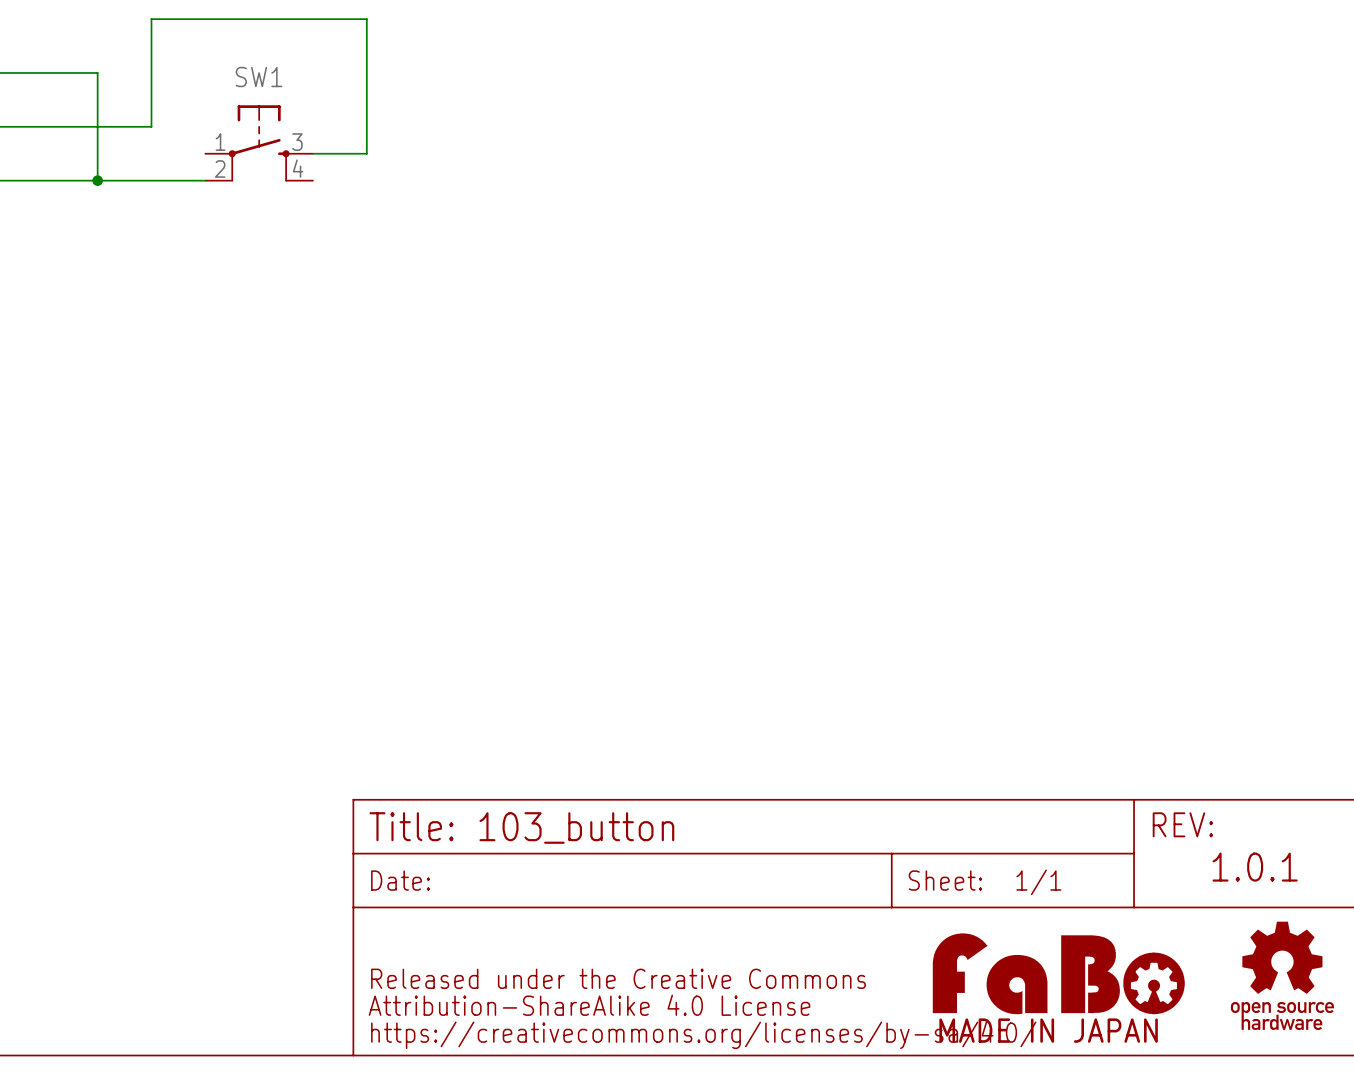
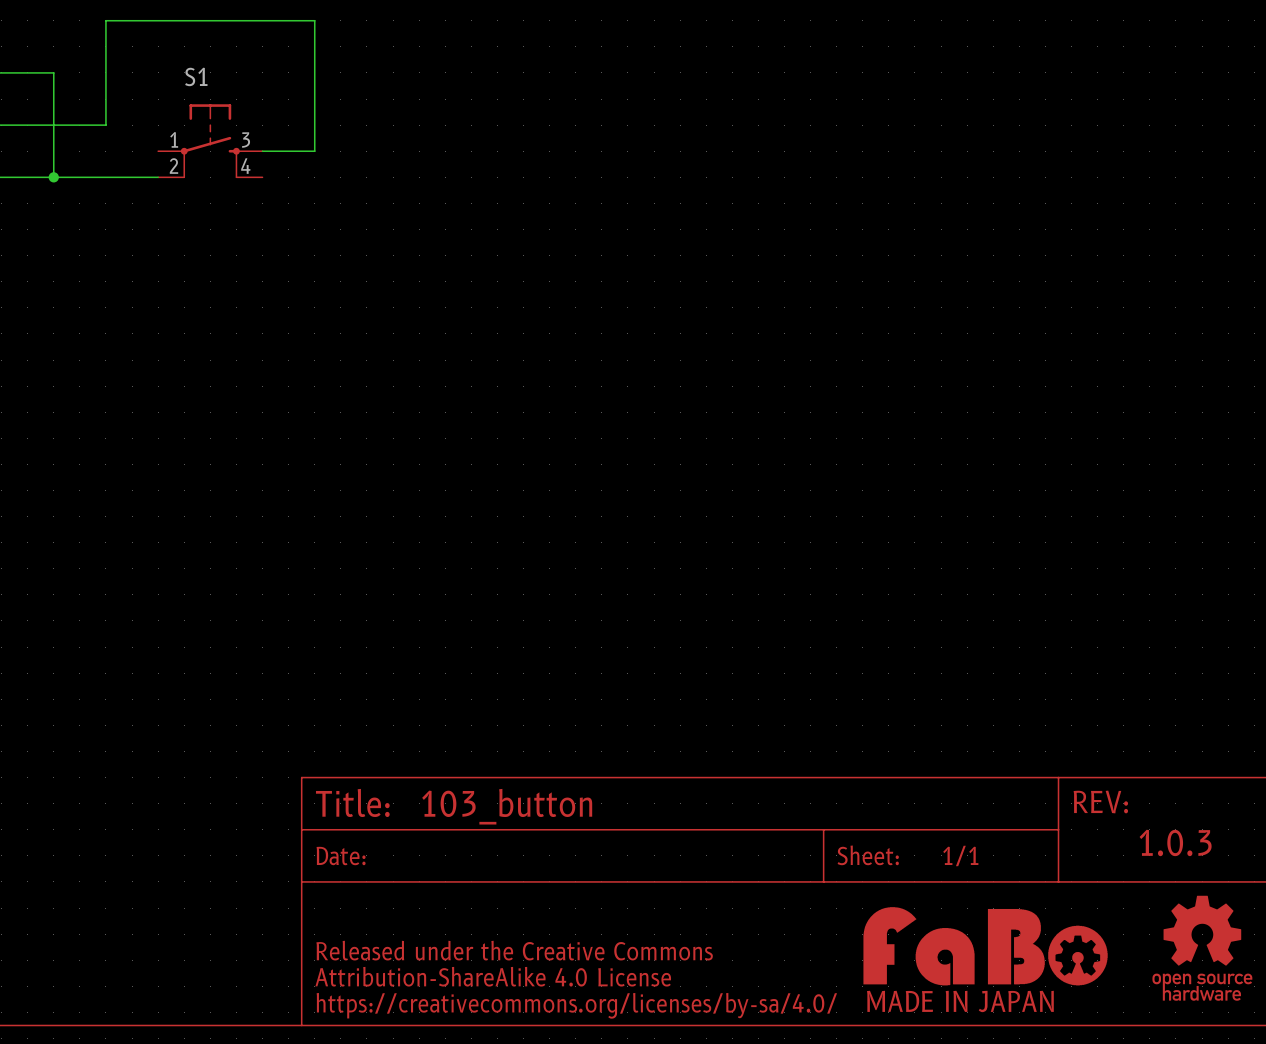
SW1 name: SW1 (259, 77) -> S1 (196, 76)
text: 1.0.1 (1255, 867) -> 1.0.3 (1175, 842)

